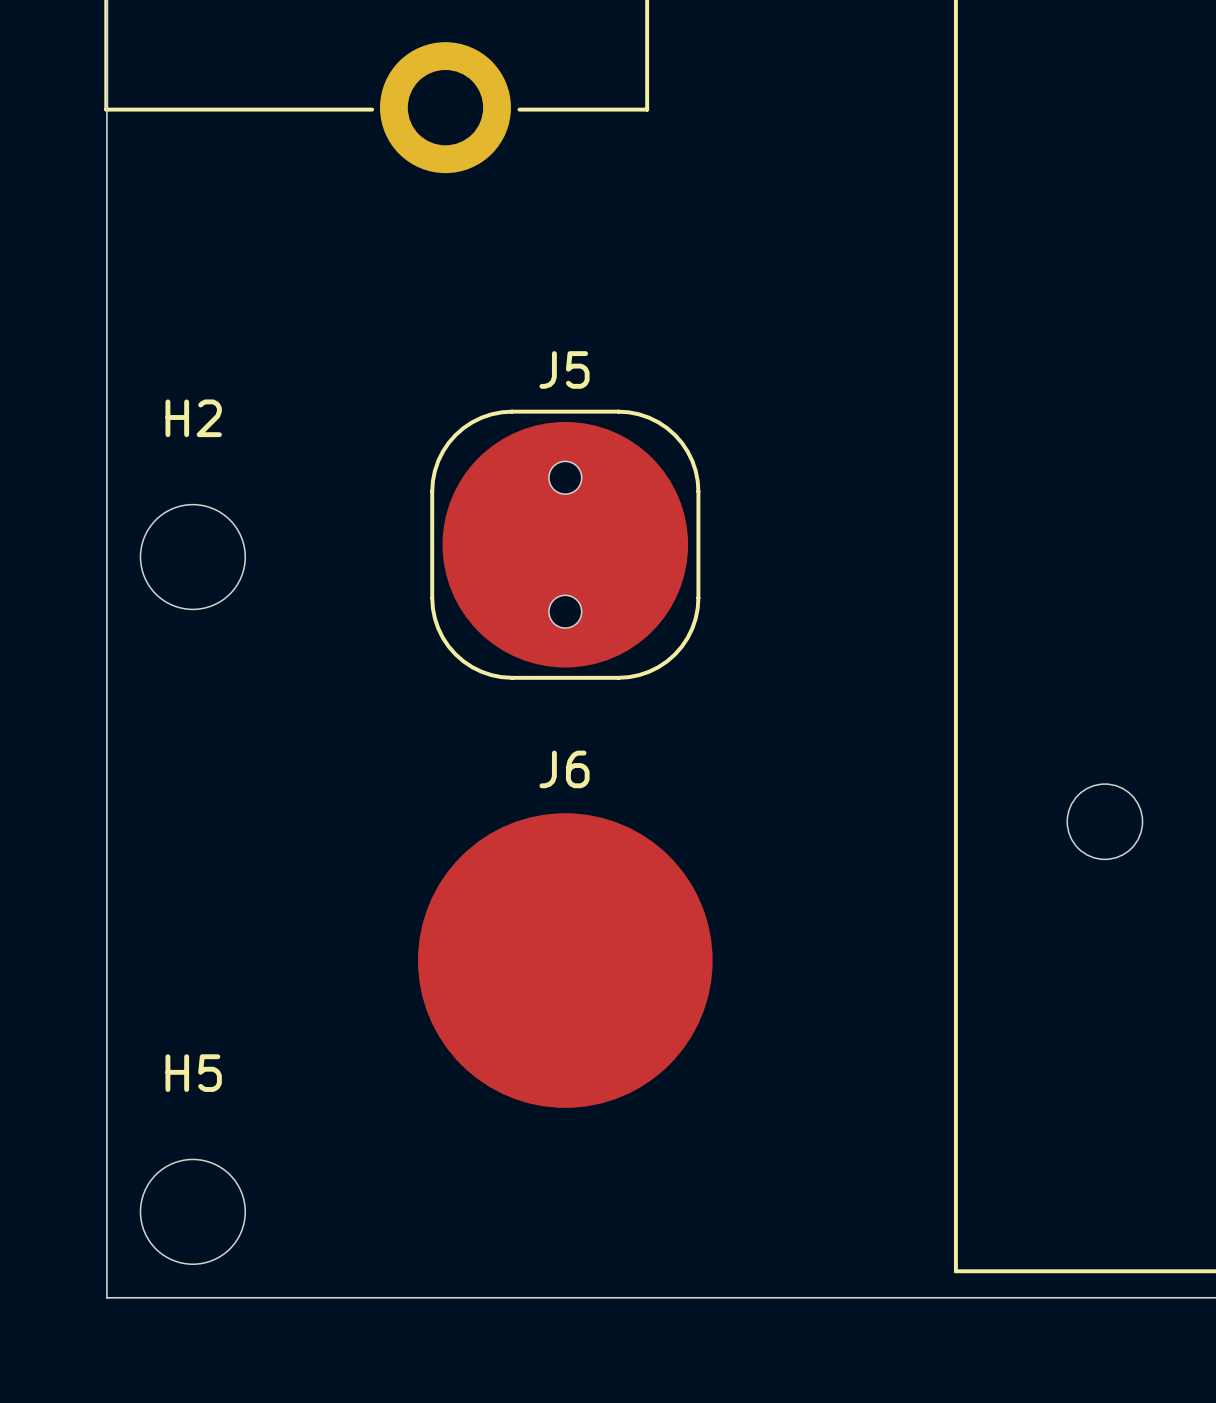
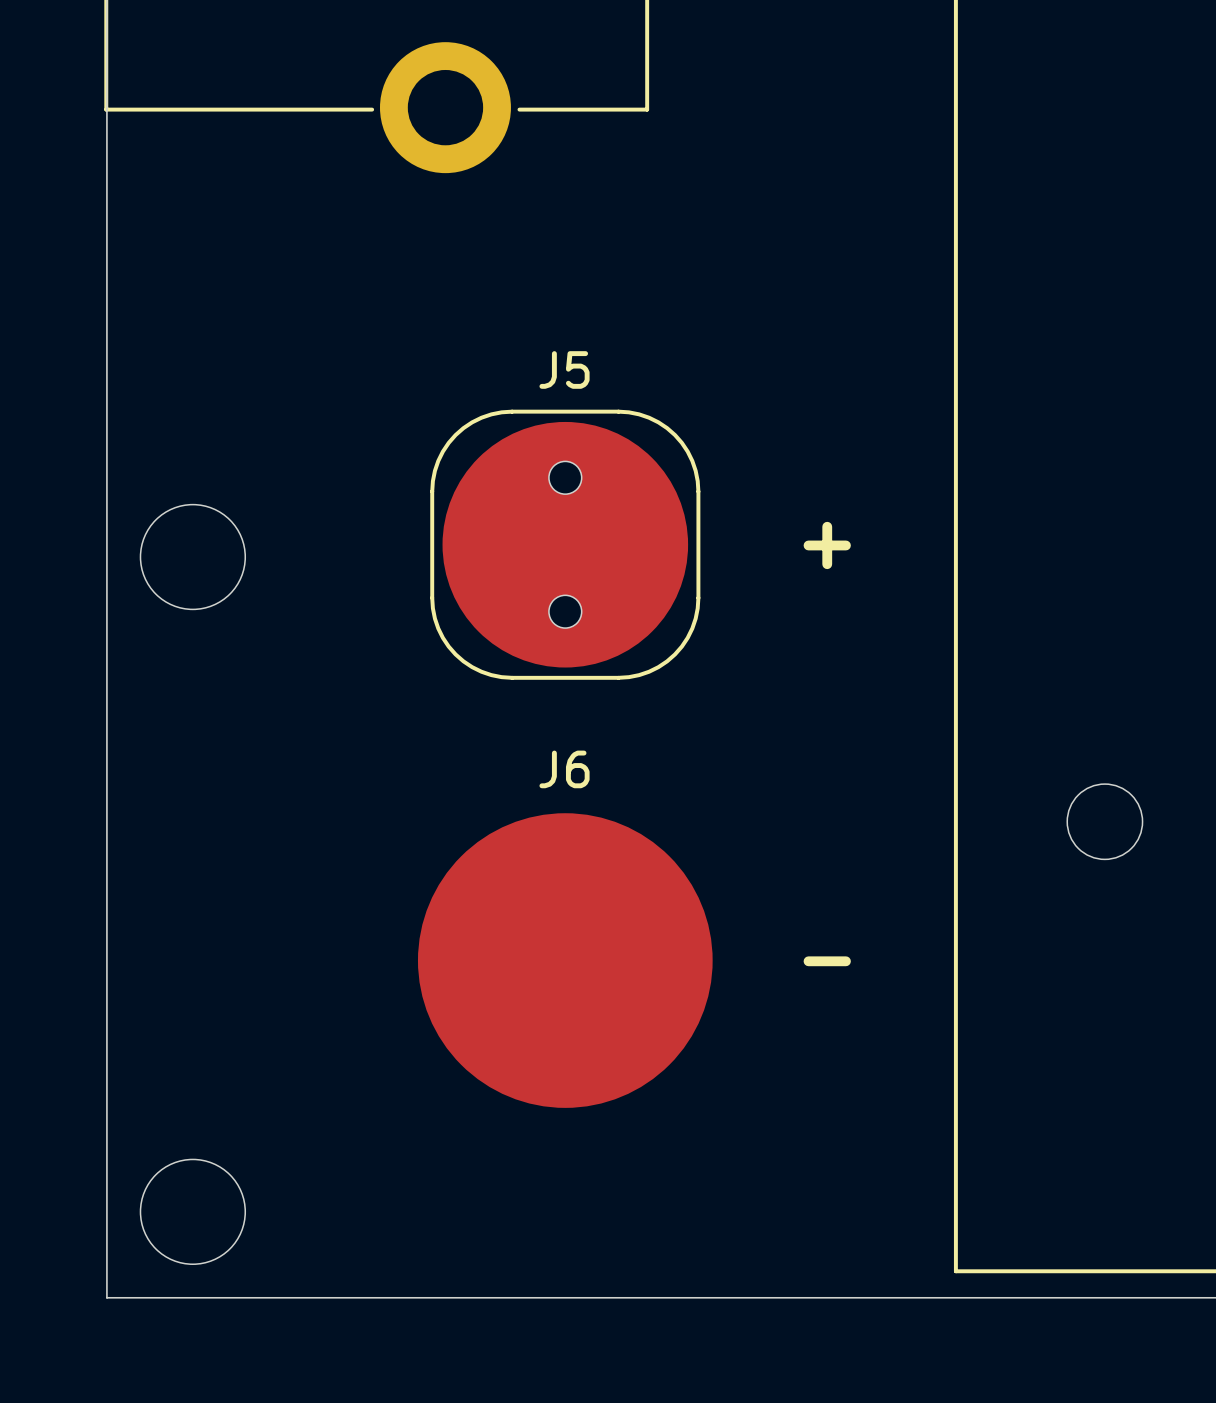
H2 name: H2 (193, 418) -> none
text: none -> + (827, 545)
text: none -> - (827, 961)
H5 name: H5 (193, 1073) -> none

